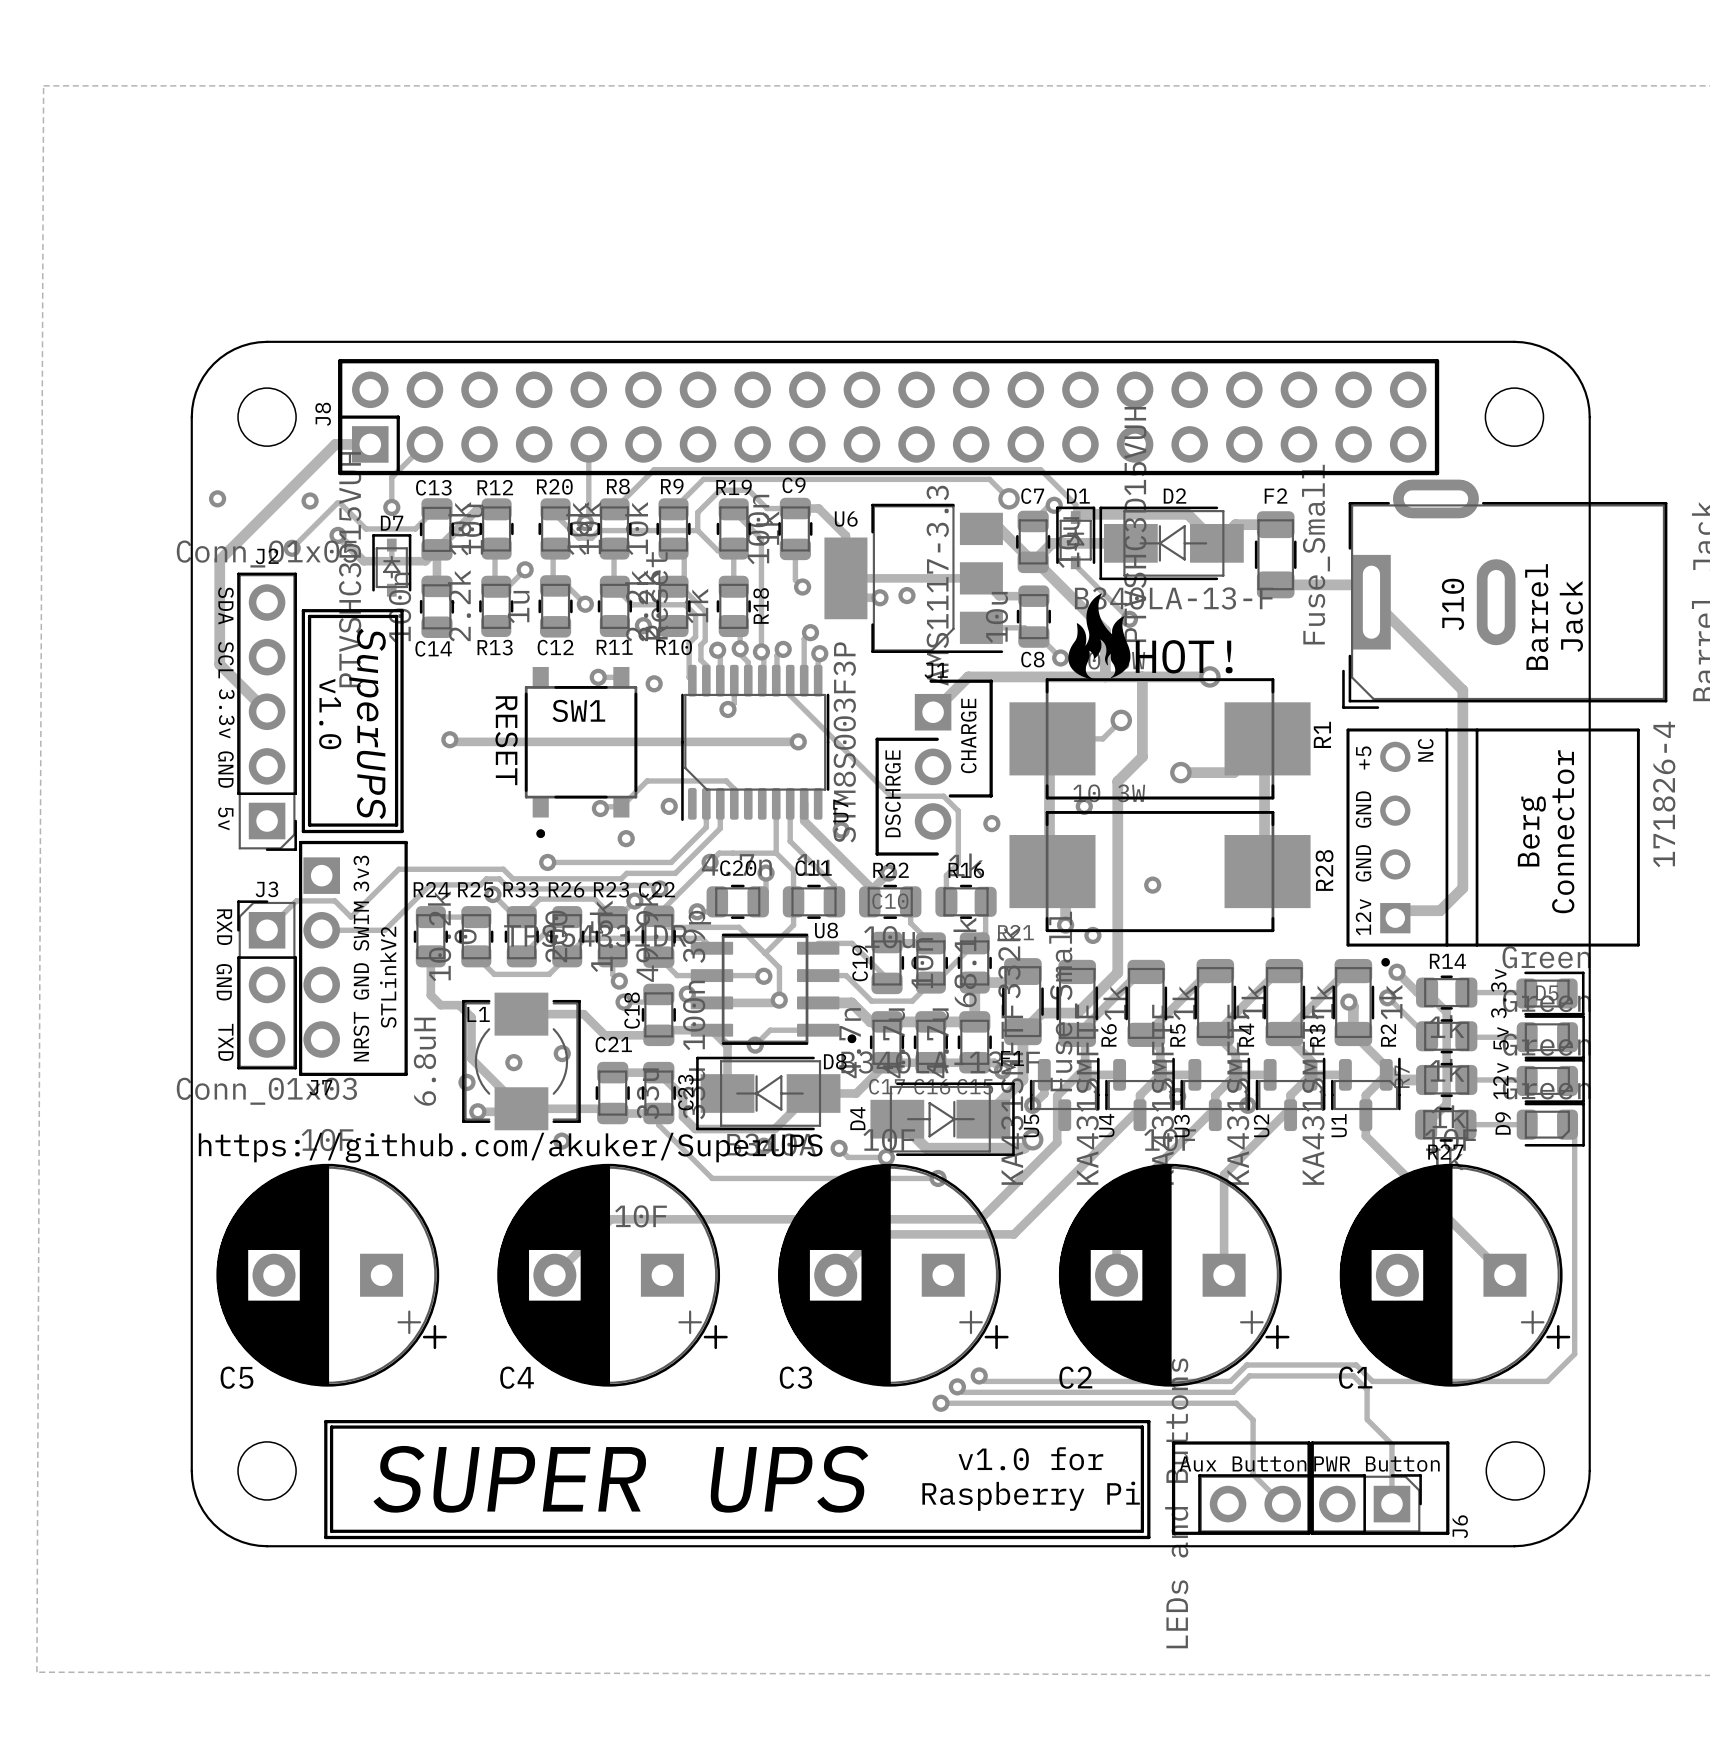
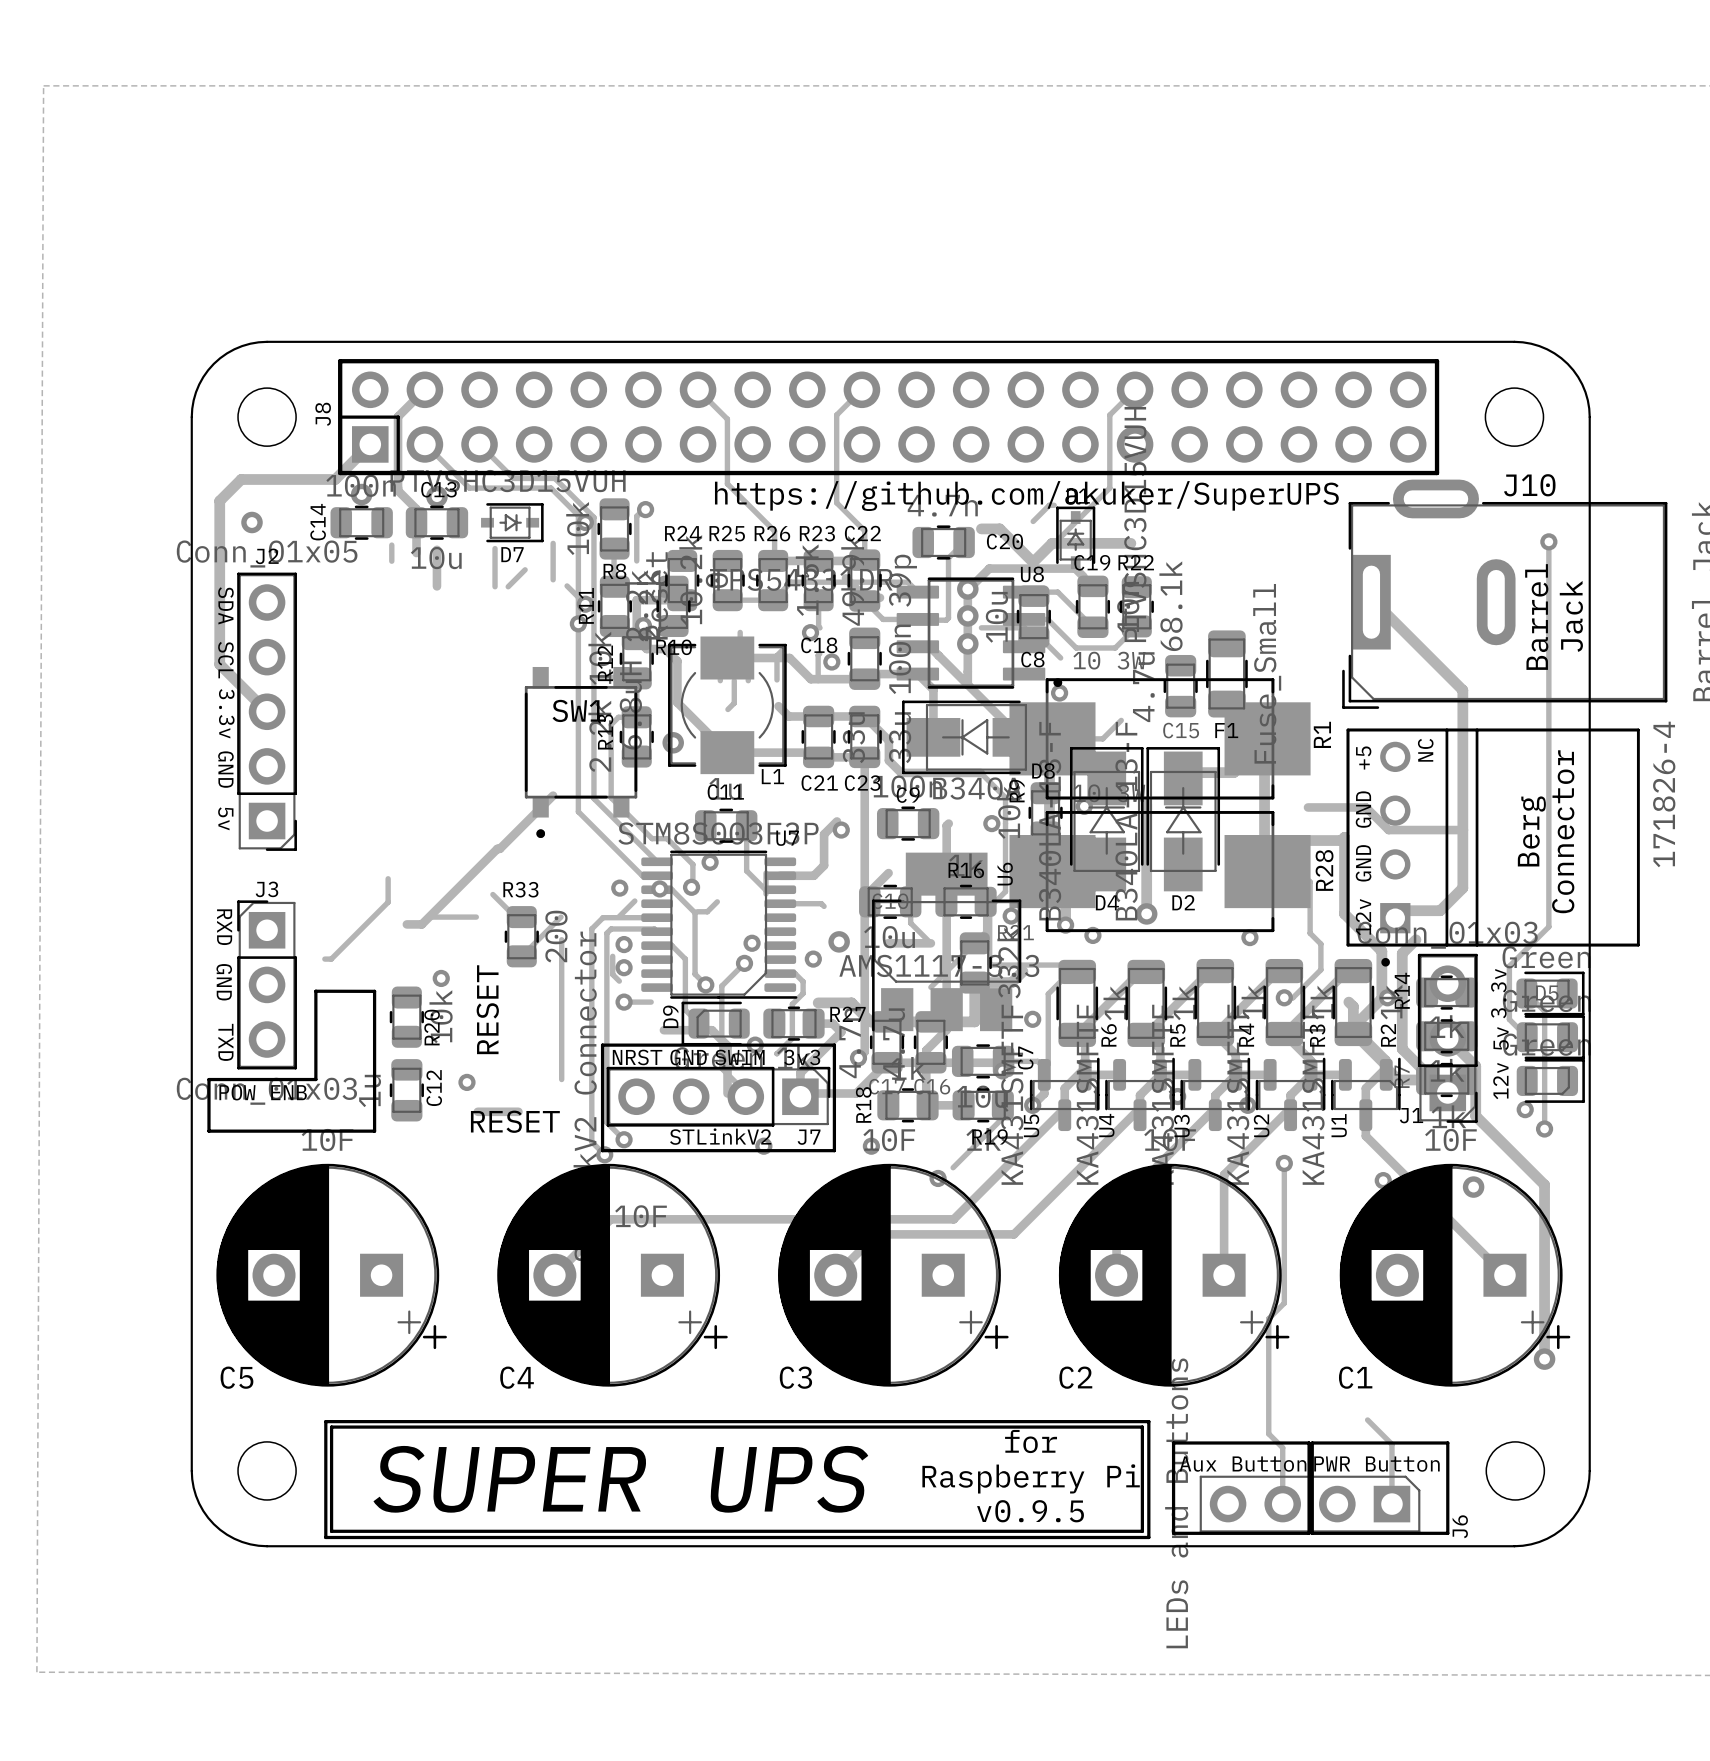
track: none -> (424, 389) (398, 416) (398, 490) (416, 509) (416, 553)
track: none -> (698, 389) (727, 419) (727, 483) (774, 531) (773, 560) (863, 560) (864, 530) (836, 502) (836, 415) (861, 389)
track: none -> (1135, 389) (1109, 415) (1109, 488) (1029, 568)
track: (370, 444) (335, 444) (219, 560) -> (370, 444) (335, 479) (241, 479) (219, 500) (219, 560)
track: (424, 444) (391, 477) (391, 507) -> (424, 444) (469, 488) (550, 488) (578, 515) (578, 811) (642, 875) (657, 875)
track: none -> (479, 444) (513, 478) (554, 478) (593, 517) (593, 798) (657, 861)
track: (588, 444) (588, 519) (585, 522) -> none
R20 name rotation: 0° (554, 486) -> 90° counterclockwise (432, 1027)
R20 name position: R20 (554, 486) -> R20 (432, 1027)
R8 name position: R8 (618, 486) -> R8 (614, 571)
R9 name rotation: 0° (672, 486) -> 90° counterclockwise (1016, 791)
R12 name rotation: 0° (495, 487) -> 90° counterclockwise (605, 663)
R12 name position: R12 (495, 487) -> R12 (605, 663)
R19 name position: R19 (734, 487) -> R19 (989, 1136)
via: none -> (361, 494)
via: none -> (436, 496)
text: none -> https://github.com/akuker/SuperUPS (1026, 496)
D2 name position: D2 (1174, 496) -> D2 (1183, 902)
via: (217, 498) -> none
track: (1009, 498) (989, 479) (703, 479) (673, 509) -> none
via: (1009, 498) -> none
via: (310, 500) -> none
via: (1054, 505) -> none
via: (391, 507) -> none
track: (435, 508) (415, 528) (365, 528) (340, 503) (337, 503) (292, 548) -> none
track: (784, 508) (767, 508) (748, 490) (720, 490) (697, 512) (697, 530) -> none
track: (806, 508) (818, 508) (845, 535) (845, 578) (981, 578) (999, 596) (1033, 596) -> none
track: (496, 509) (477, 509) (425, 561) (363, 561) (338, 535) -> none
track: (614, 509) (654, 469) (1040, 469) (1075, 504) (1075, 517) (1078, 514) (1187, 514) (1216, 543) (1235, 524) (1275, 524) -> none
track: none -> (645, 509) (636, 516) (636, 560)
via: none -> (645, 509)
track: (733, 511) (761, 539) (761, 651) (763, 654) (763, 679) -> none
track: (555, 514) (578, 538) (591, 538) (599, 530) (697, 530) -> none
via: none -> (252, 522)
D7 name position: D7 (392, 523) -> D7 (512, 554)
R12 position: (496, 528) -> (636, 658)
R20 position: (555, 528) -> (406, 1017)
R9 position: (673, 528) -> (1045, 812)
R19 rotation: 0° (733, 528) -> 90° clockwise (983, 1105)
R19 position: (733, 528) -> (983, 1105)
C9 rotation: 0° (795, 528) -> 90° clockwise (908, 823)
C9 position: (795, 528) -> (908, 823)
C13 rotation: 0° (436, 529) -> 90° clockwise (436, 522)
track: (697, 530) (717, 550) (733, 550) (733, 586) -> none
via: (338, 535) -> none
C7 rotation: 0° (1033, 541) -> 90° clockwise (983, 1061)
C7 position: (1033, 541) -> (983, 1061)
via: none -> (1548, 541)
track: none -> (964, 542) (948, 558) (948, 618) (946, 620) (883, 619) (864, 601)
track: (684, 543) (684, 580) -> none
D2 rotation: 0° (1171, 543) -> 90° clockwise (1183, 819)
D2 position: (1171, 543) -> (1183, 819)
via: (292, 548) -> none
track: (795, 549) (795, 579) (802, 587) -> none
F2: Fuse_Small (1275, 554) -> none
track: (1036, 562) (1105, 630) (1105, 676) -> none
D7 rotation: 0° (391, 565) -> 90° clockwise (512, 522)
D7 position: (391, 565) -> (512, 522)
track: (1075, 565) (1129, 619) -> none
via: (525, 569) -> none
track: none -> (1083, 576) (1075, 568) (989, 568) (967, 590) (967, 684)
U6 rotation: 0° (913, 578) -> 90° clockwise (946, 941)
U6 position: (913, 578) -> (946, 941)
track: (1275, 584) (1354, 584) (1371, 602) -> none
track: (614, 586) (632, 604) (685, 604) (695, 615) (695, 636) (689, 643) (689, 677) (692, 680) -> none
track: (680, 586) (705, 611) (705, 640) (700, 645) (700, 660) (706, 666) (706, 680) -> none
via: (802, 587) -> none
via: none -> (967, 589)
track: none -> (917, 592) (907, 582) (791, 582) (773, 600) (727, 600)
drawing: [1068, 593, 1131, 680] -> none
via: (906, 595) -> none
via: (880, 597) -> none
track: none -> (682, 600) (636, 600) (636, 639) (646, 649) (665, 649) (677, 661) (677, 702) (727, 752) (813, 752) (818, 757) (864, 757) (864, 1051) (858, 1058)
track: none -> (818, 600) (819, 627)
J10 name rotation: 0° (1453, 604) -> 90° clockwise (1529, 485)
J10 name position: J10 (1453, 604) -> J10 (1529, 485)
C14 rotation: 0° (436, 606) -> 90° clockwise (361, 522)
C14 position: (436, 606) -> (361, 522)
R13 position: (496, 606) -> (636, 736)
C12 position: (555, 606) -> (406, 1090)
R18 rotation: 0° (733, 606) -> 90° clockwise (907, 1105)
R18 position: (733, 606) -> (907, 1105)
R18 name position: R18 (761, 606) -> R18 (863, 1104)
line: (303, 610) (402, 610) (402, 831) (303, 831) (303, 610) -> none
via: none -> (967, 615)
line: (309, 616) (396, 616) (396, 825) (309, 825) (309, 616) -> none
track: none -> (1024, 619) (1047, 619) (1076, 648) (1115, 648) (1136, 626)
via: (1129, 619) -> none
via: none -> (578, 623)
track: (810, 632) (804, 638) (804, 680) -> none
via: none -> (967, 643)
track: none -> (917, 646) (929, 646) (1019, 737)
R13 name rotation: 0° (495, 647) -> 90° counterclockwise (605, 731)
R13 name position: R13 (495, 647) -> R13 (605, 731)
C12 name rotation: 0° (555, 647) -> 90° counterclockwise (434, 1088)
R11 name rotation: 0° (614, 647) -> 90° counterclockwise (586, 605)
via: (740, 648) -> none
via: (783, 649) -> none
via: (717, 650) -> none
via: (761, 651) -> none
via position: (819, 653) -> (831, 661)
text: HOT! (1184, 656) -> none
track: none -> (727, 657) (789, 657) (810, 679) (864, 679) (869, 674) (917, 674) (933, 689) (933, 737)
via position: (1060, 657) -> (1059, 693)
track: (1141, 676) (1142, 756) (1117, 781) (1117, 972) (1077, 1013) (1041, 1013) (1022, 1031) (1022, 1079) (983, 1119) -> none
track: (1209, 676) (968, 676) (933, 712) -> none
via: (1209, 676) -> none
via: (598, 677) -> none
track: none -> (636, 678) (636, 717) (618, 717) (611, 724) (611, 797) (652, 838) (667, 838) (692, 864) (691, 887)
track: (790, 680) (790, 695) (890, 796) (943, 796) (958, 811) (958, 863) (946, 875) (946, 901) -> none
line: (931, 681) (991, 681) (991, 795) (950, 795) -> none
via: (654, 683) -> none
track: none -> (778, 706) (788, 716) (864, 716) (888, 740) (888, 760) (901, 772) (980, 772) (1005, 797) (1005, 891) (989, 907) (989, 963) (991, 965) (1077, 965) (1048, 993) (1048, 1064) (1044, 1067) (1037, 1061) (1003, 1061)
via: (727, 709) -> none
text: v1.0 (330, 714) -> none
via: (1121, 720) -> none
text: SuperUPS (367, 723) -> none
text: CHARGE (968, 735) -> none
track: (449, 739) (452, 741) (798, 741) -> none
via: (449, 739) -> none
line: (937, 739) (877, 739) (877, 854) (937, 854) -> none
text: RESET (506, 740) -> none
via: (798, 741) -> none
via: none -> (673, 742)
U7 rotation: 0° (755, 742) -> 90° counterclockwise (719, 924)
U7 position: (755, 742) -> (719, 924)
J1 side: bottom (933, 766) -> top (1447, 1038)
via: (1180, 772) -> none
text: DSCHRGE (892, 793) -> none
track: none -> (553, 795) (421, 924) (406, 924)
track: (706, 803) (706, 827) (671, 862) (547, 862) -> none
track: (720, 803) (720, 828) (675, 873) (626, 873) (621, 878) (512, 878) (503, 869) (398, 869) (351, 917) (334, 900) (296, 900) (267, 930) -> none
track: (734, 803) (734, 789) (726, 780) (647, 780) (621, 806) (602, 806) (600, 808) -> none
track: (776, 803) (776, 853) -> none
track: (790, 803) (790, 841) (834, 885) (834, 901) -> none
track: (804, 803) (804, 820) (869, 886) (869, 901) -> none
track: none -> (1146, 804) (1146, 913)
via: (669, 806) -> none
track: none -> (1307, 807) (1366, 807) (1388, 830) (1462, 830)
via: (600, 808) -> none
track: none -> (836, 821) (824, 834) (824, 865) (813, 875) (780, 875)
track: none -> (948, 823) (946, 825) (946, 1029) (926, 1050) (926, 1104) (963, 1105)
track: none -> (746, 825) (746, 870) (765, 889) (780, 889)
via: (626, 838) -> none
line: (300, 842) (406, 842) (406, 1074) (300, 1074) (300, 842) -> none
track: (776, 853) (719, 853) (658, 913) -> none
track: (776, 853) (793, 870) (793, 925) (765, 953) -> none
via: (547, 862) -> none
C20 name position: C20 (738, 868) -> C20 (1004, 541)
R22 name position: R22 (891, 870) -> R22 (1136, 562)
text rotation: 0° (361, 873) -> 90° clockwise (802, 1057)
text position: 3v3 (361, 873) -> 3v3 (802, 1057)
via: (766, 873) -> none
via: (888, 873) -> none
track: none -> (388, 878) (388, 902) (331, 959) (324, 959)
track: none -> (1307, 879) (1310, 881) (1310, 933) (1320, 944) (1320, 969) (1292, 997) (1284, 997)
via: (1152, 885) -> none
track: (659, 888) (656, 885) (628, 885) (624, 888) (509, 888) (499, 878) (486, 878) (480, 884) (430, 884) (384, 930) (321, 930) -> none
track: none -> (657, 889) (671, 889) (695, 912) (695, 974) (705, 984)
via: (492, 894) -> none
via position: (634, 901) -> (619, 888)
C20 position: (737, 901) -> (943, 542)
C11 position: (813, 901) -> (726, 825)
track: none -> (780, 903) (821, 903) (824, 906)
via position: (697, 911) -> (691, 887)
via: none -> (1146, 913)
track: (658, 916) (669, 927) (739, 927) (779, 967) (779, 999) -> none
via: none -> (1011, 916)
track: (521, 917) (539, 899) (594, 899) (612, 917) -> none
track: none -> (657, 917) (603, 917) (591, 928) (591, 1141) (604, 1154)
text rotation: 0° (361, 926) -> 90° clockwise (739, 1057)
text position: SWIM (361, 926) -> SWIM (739, 1057)
track: none -> (657, 931) (654, 928) (611, 928) (606, 933) (606, 1122) (624, 1139)
R24 position: (430, 936) -> (682, 580)
R25 position: (476, 936) -> (727, 580)
R26 position: (567, 936) -> (773, 580)
R23 position: (612, 936) -> (818, 580)
C22 position: (658, 936) -> (864, 580)
via: none -> (1249, 937)
track: none -> (561, 939) (561, 1079)
track: none -> (1415, 939) (1402, 953) (1402, 1049) (1446, 1092)
via: none -> (839, 941)
via: none -> (752, 943)
track: (818, 943) (851, 943) (887, 978) -> (1024, 592) (1057, 592) (1092, 627)
via: none -> (624, 944)
track: none -> (657, 945) (671, 945) (685, 959) (685, 1010) (698, 1023)
track: (711, 948) (702, 938) (585, 938) (549, 974) (494, 974) (476, 956) -> none
track: (430, 956) (430, 995) (440, 1005) (459, 1005) (471, 1017) (471, 1058) (521, 1108) (607, 1108) -> none
J7 side: bottom (321, 957) -> top (718, 1096)
track: (658, 957) (677, 975) (763, 976) -> none
via: none -> (813, 959)
R14 name rotation: 0° (1447, 961) -> 90° counterclockwise (1402, 990)
R14 name position: R14 (1447, 961) -> R14 (1402, 990)
C19 position: (887, 962) -> (1092, 606)
R22 position: (930, 962) -> (1136, 606)
track: none -> (744, 963) (721, 986) (721, 1068) (745, 1092)
via: none -> (744, 963)
C19 name rotation: 0° (860, 963) -> 90° clockwise (1092, 562)
track: (1397, 972) (1417, 992) (1427, 992) (1446, 1012) (1446, 1104) (1426, 1124) -> none
via: (1397, 972) -> none
track: none -> (780, 973) (795, 973) (803, 981) (803, 993) (792, 1004) (792, 1038) (777, 1053)
track: (818, 975) (846, 975) (871, 1001) (912, 1001) (930, 982) -> none
via: (763, 976) -> none
text rotation: 0° (388, 977) -> 90° clockwise (720, 1136)
text position: STLinkV2 (388, 977) -> STLinkV2 (720, 1136)
via: none -> (441, 978)
text rotation: 0° (361, 981) -> 90° clockwise (688, 1057)
text position: GND (361, 981) -> GND (688, 1057)
via position: (619, 981) -> (624, 967)
U8 position: (773, 989) -> (979, 633)
line: none -> (315, 991) (374, 991) (374, 1131) (208, 1131) (208, 1079) (315, 1079) (315, 991)
track: (1466, 992) (1525, 992) -> none
track: none -> (1526, 993) (1544, 1011) (1544, 1128)
via position: (687, 994) -> (705, 984)
via: none -> (1284, 997)
track: (1387, 997) (1427, 1036) -> none
track: (779, 1000) (776, 1002) (711, 1002) -> none
via: (779, 1000) -> none
F1 position: (1022, 1001) -> (1226, 673)
via: (1348, 1002) -> none
text: none -> RESET (487, 1009)
C18 name rotation: 0° (632, 1010) -> 90° clockwise (819, 645)
L1 name position: L1 (478, 1014) -> L1 (772, 776)
track: (521, 1014) (583, 1014) (604, 1035) (658, 1035) -> none
C18 position: (658, 1014) -> (864, 658)
via: none -> (1032, 1019)
track: none -> (813, 1023) (832, 1023) (841, 1032) (800, 1073) (800, 1092)
track: (818, 1030) (770, 1030) (755, 1045) -> none
text rotation: 0° (361, 1036) -> 90° clockwise (637, 1057)
text position: NRST (361, 1036) -> NRST (637, 1057)
track: (1467, 1037) (1527, 1037) -> (1548, 541) (1548, 926) (1509, 966) (1509, 1019) (1527, 1037)
track: none -> (1447, 1038) (1475, 1066) (1475, 1116) (1544, 1184) (1544, 1359)
C15 position: (974, 1042) -> (1180, 686)
C21 name position: C21 (613, 1044) -> C21 (819, 783)
line: none -> (602, 1045) (834, 1045) (834, 1150) (602, 1150) (602, 1045)
via: (562, 1053) -> none
via: none -> (858, 1058)
F1 name position: F1 (1012, 1058) -> F1 (1226, 730)
L1 position: (521, 1061) -> (727, 705)
D8 name position: D8 (835, 1061) -> D8 (1043, 771)
via: (513, 1062) -> none
track: (612, 1072) (658, 1072) (683, 1096) (683, 1116) (695, 1129) (774, 1129) (810, 1093) -> none
track: (1386, 1074) (1365, 1095) -> (1307, 840) (1341, 840) (1344, 837) (1344, 913) (1381, 951) (1381, 998) (1353, 1027) (1386, 1060) (1386, 1067) (1365, 1088) (1365, 1095)
track: (1466, 1079) (1526, 1079) -> none
track: (1064, 1088) (1057, 1095) (1057, 1142) (980, 1219) (953, 1219) -> (1064, 1088) (1064, 1108) (953, 1219)
text: none -> POW ENB (263, 1092)
C23 name rotation: 0° (685, 1092) -> 90° clockwise (862, 783)
C23 name position: C23 (685, 1092) -> C23 (862, 783)
C21 position: (612, 1093) -> (818, 736)
C23 position: (658, 1093) -> (864, 736)
D8 position: (768, 1093) -> (974, 737)
track: none -> (1002, 1105) (1002, 1117) (953, 1167)
via: none -> (1525, 1109)
via: (477, 1111) -> none
track: (612, 1113) (658, 1113) (658, 1125) (712, 1178) (938, 1178) -> none
track: (897, 1119) (926, 1148) (1024, 1148) (1032, 1139) -> none
D4 rotation: 0° (942, 1119) -> 90° counterclockwise (1106, 819)
D4 position: (942, 1119) -> (1106, 819)
text: none -> RESET (515, 1121)
R27 position: (1445, 1124) -> (793, 1023)
track: (1465, 1124) (1527, 1124) -> none
D9 rotation: 0° (1550, 1124) -> 180° (715, 1023)
D9 position: (1550, 1124) -> (715, 1023)
via: none -> (1544, 1128)
track: (1574, 1131) (1574, 1354) (1547, 1381) (1372, 1381) (1356, 1365) (1246, 1365) (1230, 1381) (984, 1381) (979, 1375) -> none
via: none -> (624, 1139)
via: (1032, 1139) -> none
via: (561, 1141) -> none
text: https://github.com/akuker/SuperUPS (510, 1147) -> none
track: (839, 1148) (848, 1157) (886, 1157) -> none
via: (839, 1148) -> none
R27 name position: R27 (1445, 1151) -> R27 (847, 1014)
via: none -> (604, 1154)
via position: (886, 1157) -> (871, 1146)
via: none -> (1284, 1163)
via: none -> (1383, 1180)
via: none -> (1473, 1187)
via: none -> (1544, 1359)
via: (979, 1375) -> none
track: (957, 1386) (962, 1392) (1233, 1392) (1249, 1375) (1353, 1375) (1367, 1389) (1367, 1419) -> none
via: (957, 1386) -> none
track: (940, 1403) (1236, 1403) (1253, 1419) (1253, 1474) (1282, 1504) -> (1284, 1163) (1284, 1303) (1268, 1318) (1268, 1433) (1282, 1447) (1282, 1504)
via: (940, 1403) -> none
text: v1.0 for (1030, 1458) -> for (1031, 1441)
J6 footprint: [1198, 1474, 1422, 1534] -> [1199, 1475, 1421, 1533]
text position: Raspberry Pi (1031, 1496) -> Raspberry Pi (1031, 1478)
text: none -> v0.9.5 (1030, 1511)

